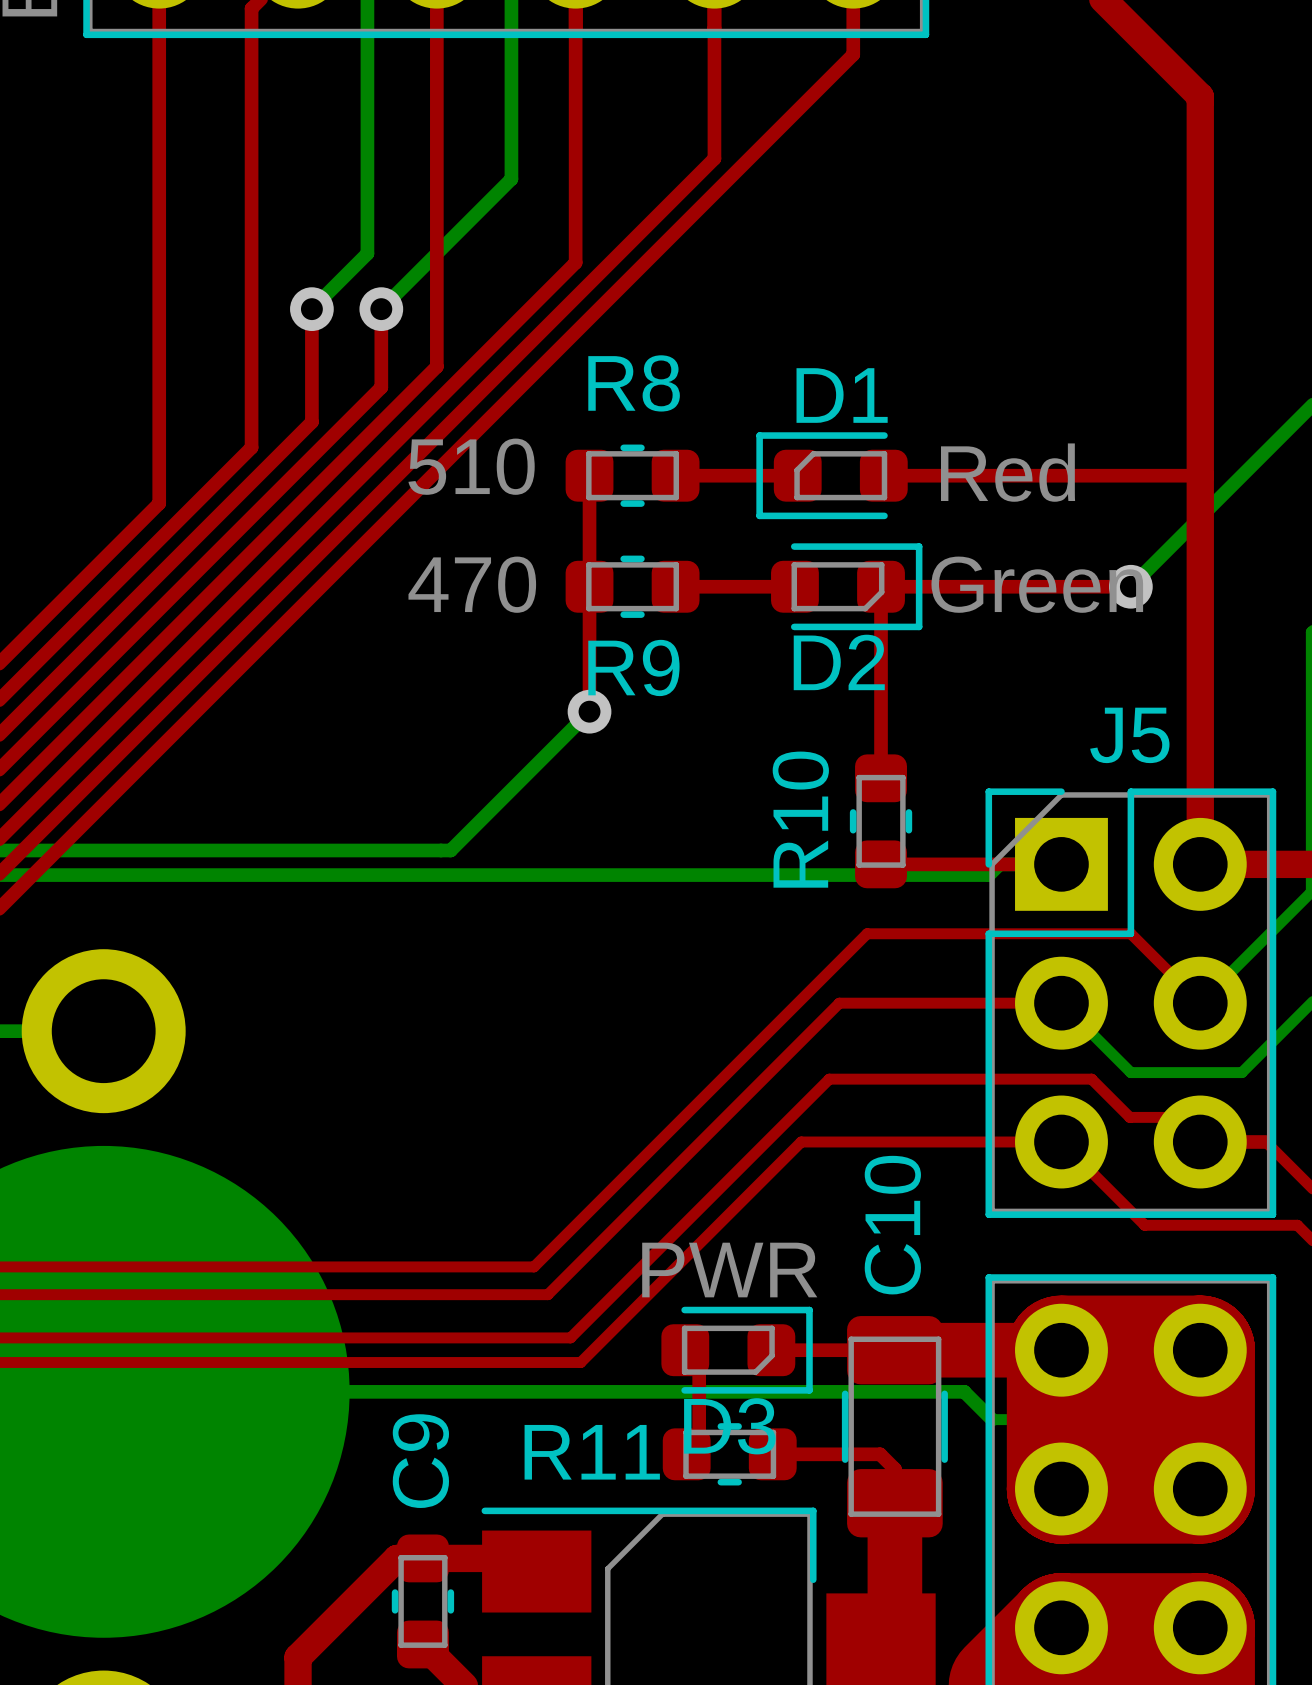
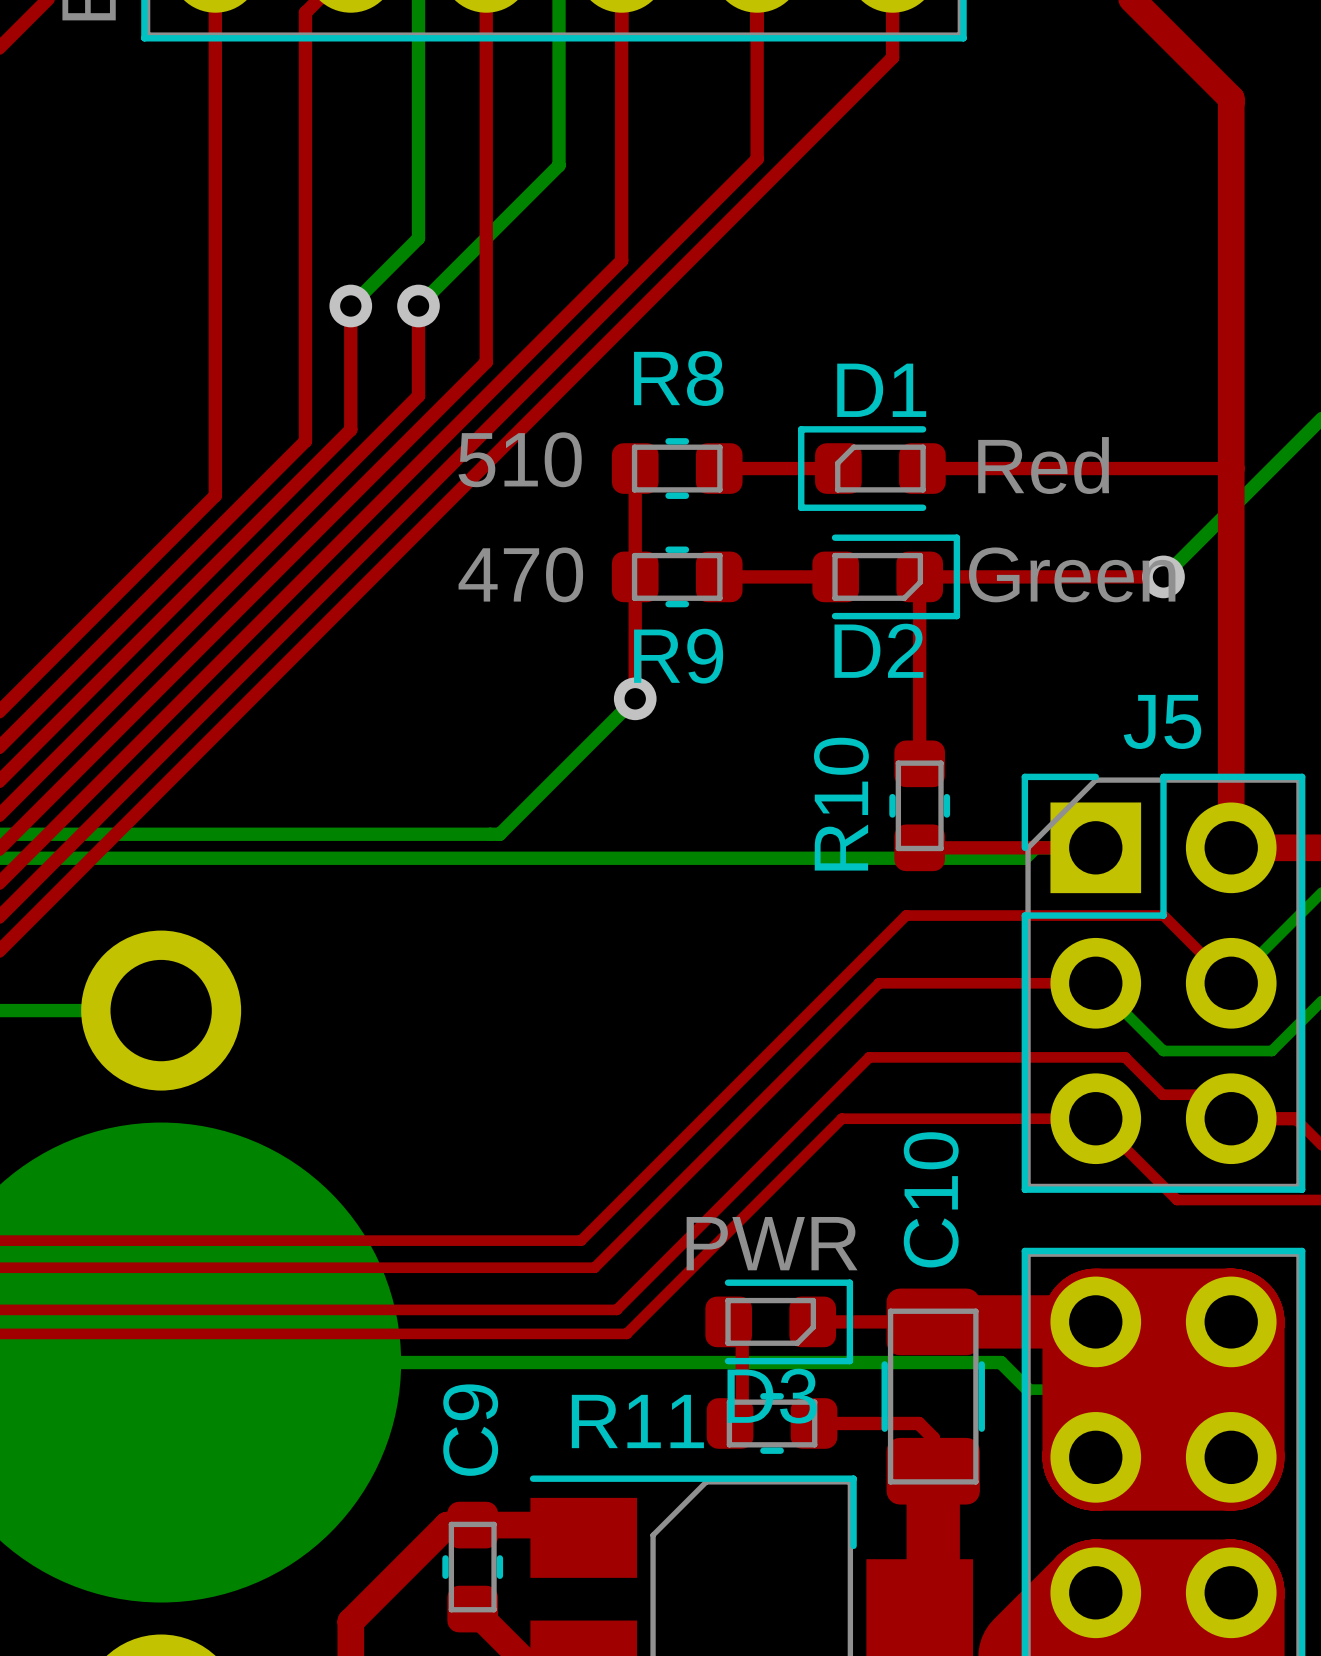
bottom track: (511, 165) (511, 179) (381, 309) -> (559, 165) (418, 306)
bottom track: (367, 239) (367, 253) (311, 309) -> (418, 238) (350, 306)
top track: (311, 309) (311, 422) (298, 435) -> (350, 306) (350, 429)
via position: (311, 309) -> (350, 306)
top track: (381, 309) (381, 387) (367, 401) -> (418, 306) (418, 395)
via position: (381, 309) -> (418, 306)

